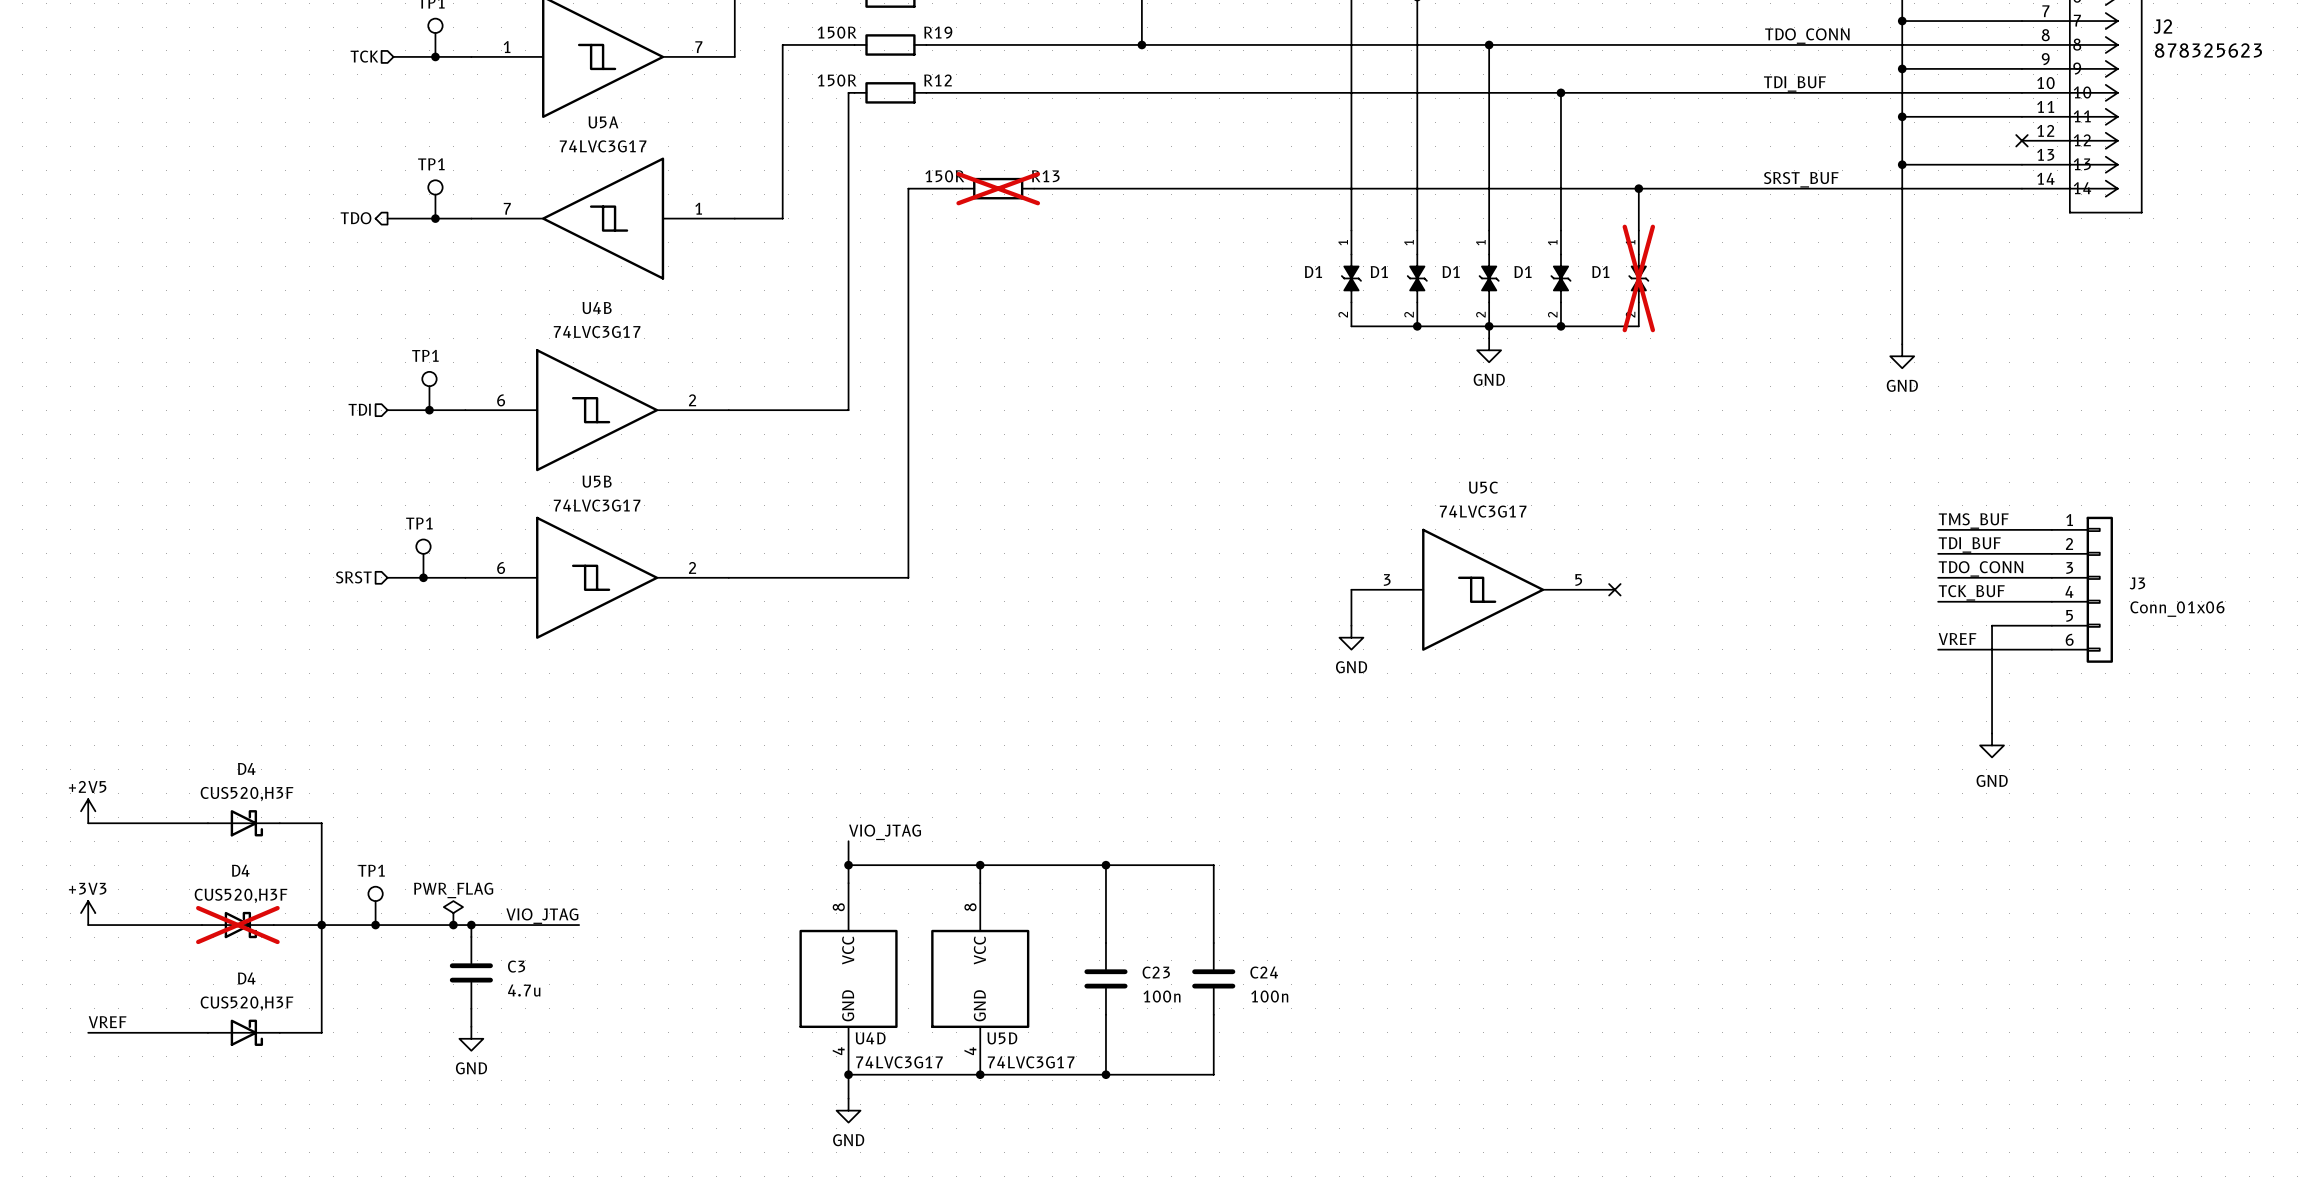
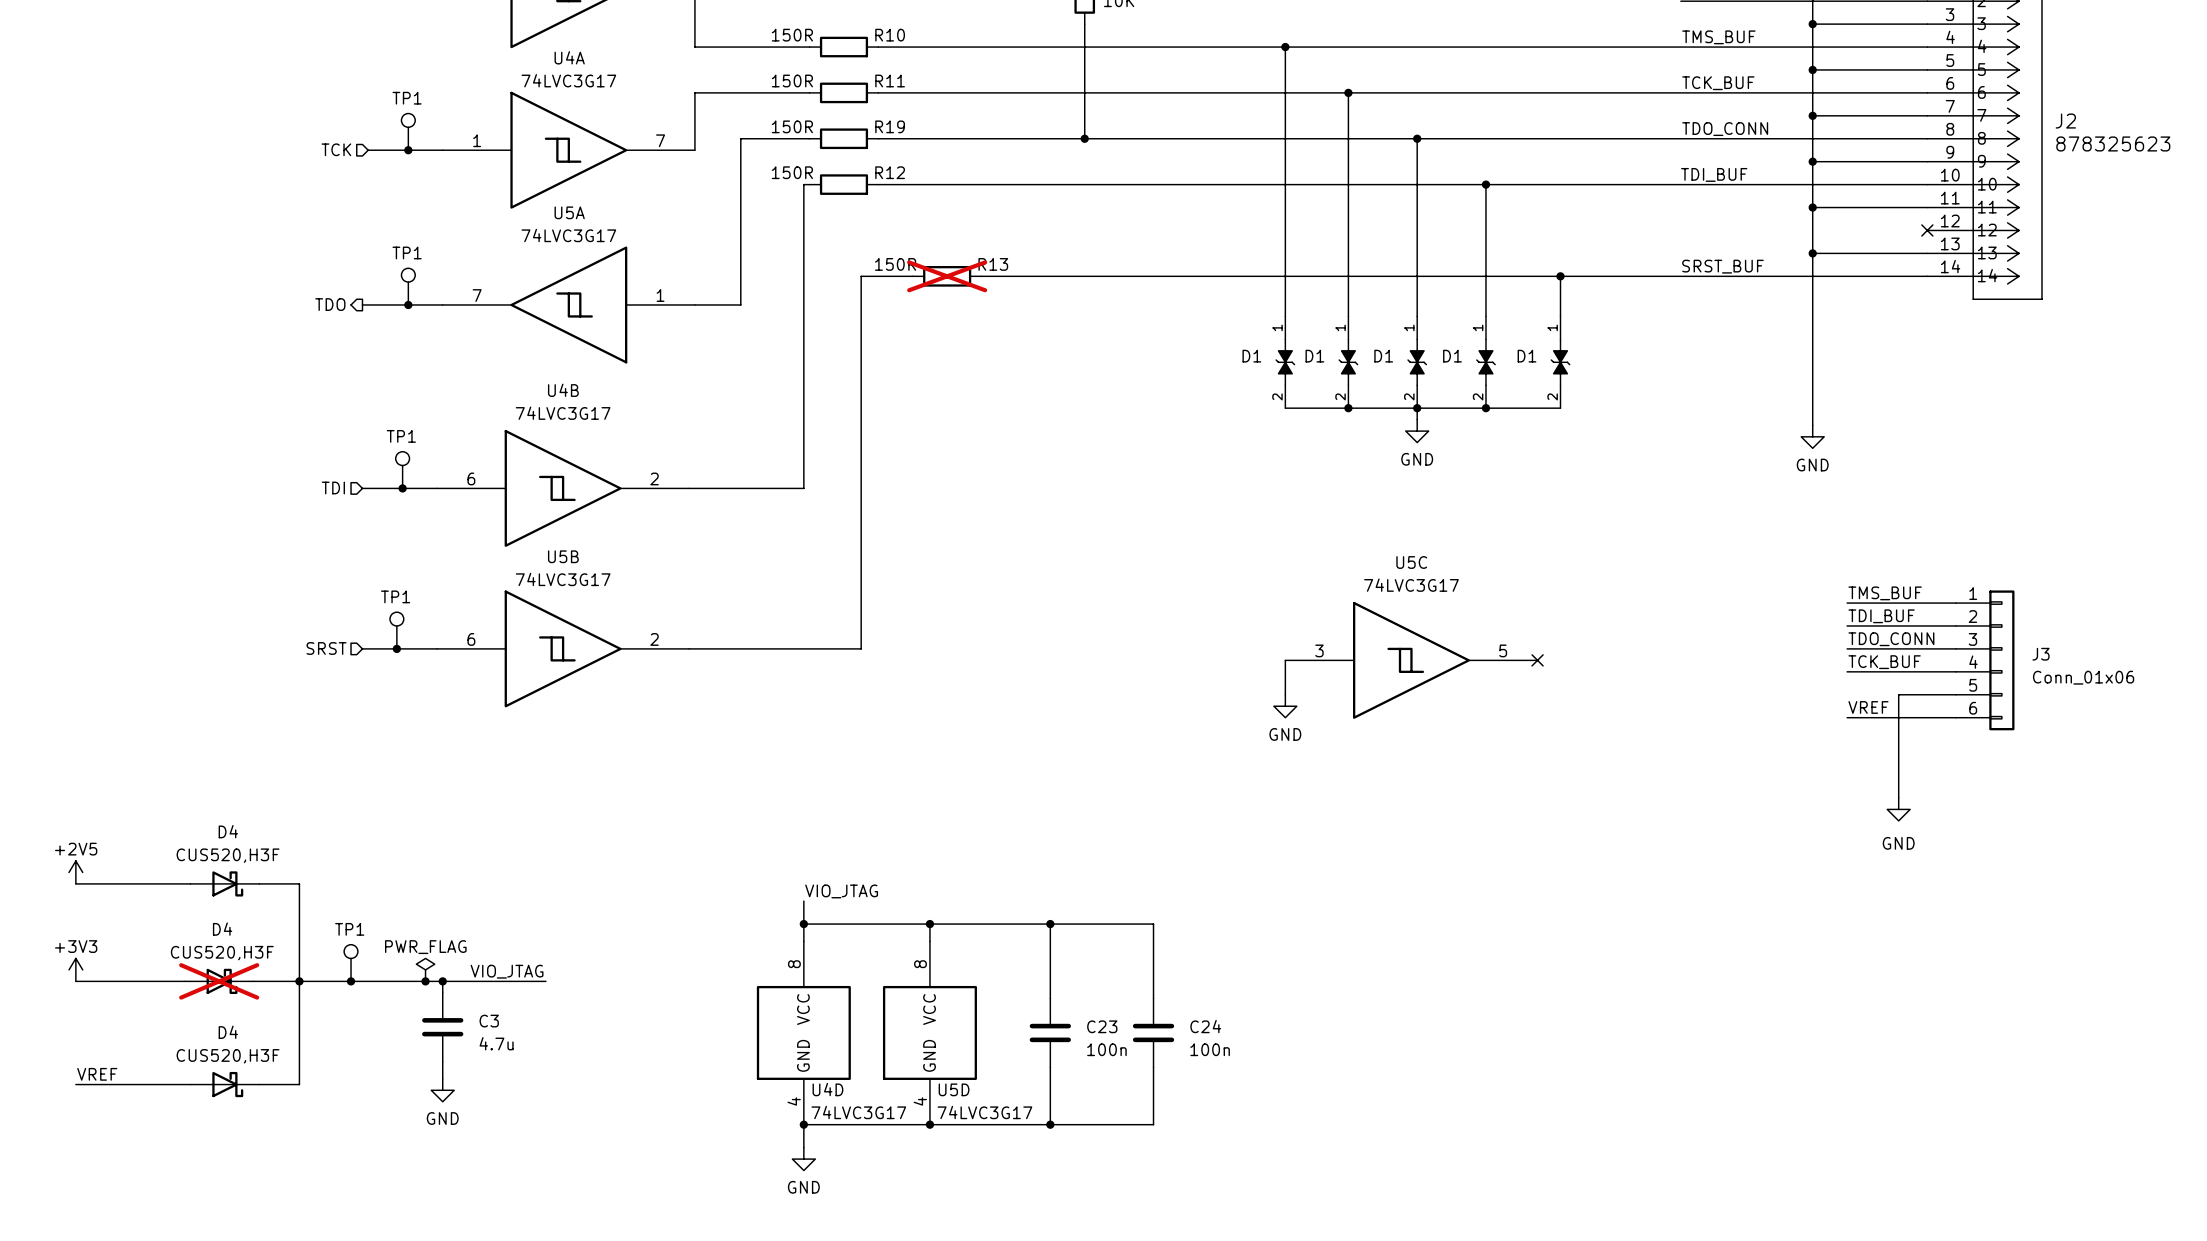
D1 do-not-place cross: (1638, 278) -> none

